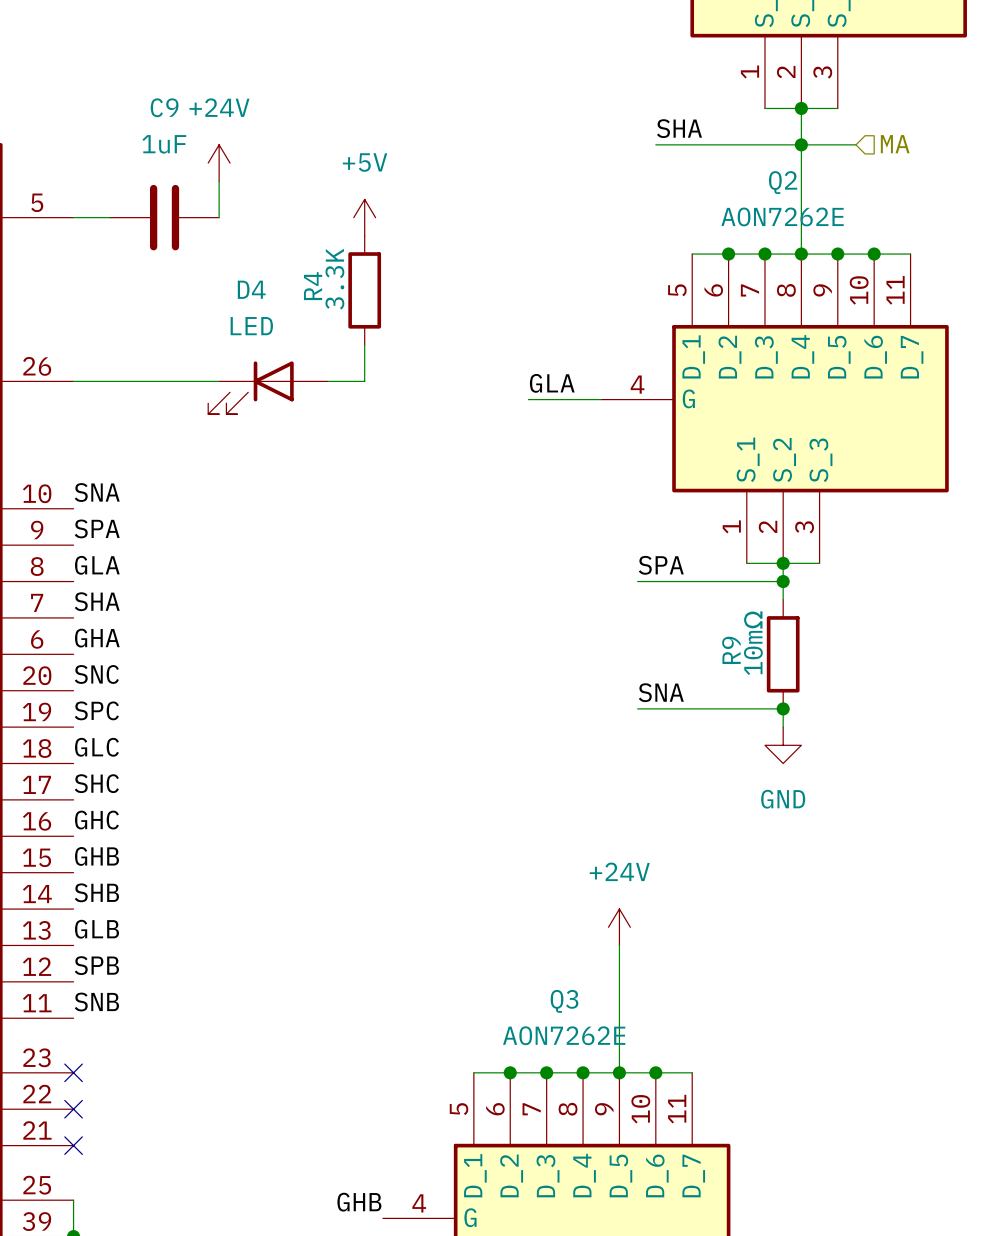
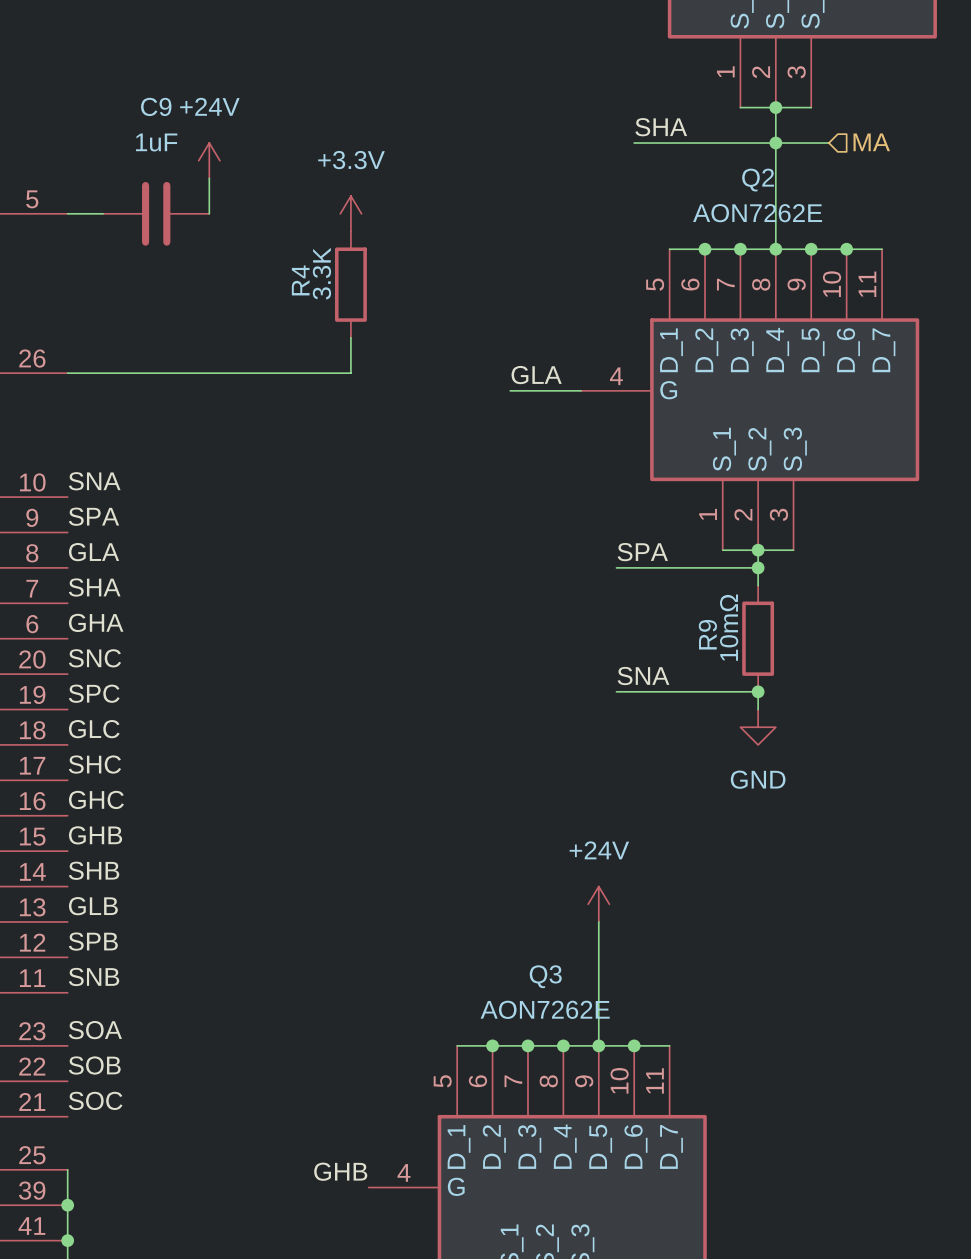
power symbol: +5V (364, 217) -> +3.3V (350, 213)
D4: LED (268, 387) -> none
label: none -> SOA (95, 1030)
no-connect mark: (73, 1072) -> none
label: none -> SOB (94, 1065)
no-connect mark: (73, 1109) -> none
label: none -> SOC (95, 1100)
no-connect mark: (73, 1145) -> none

